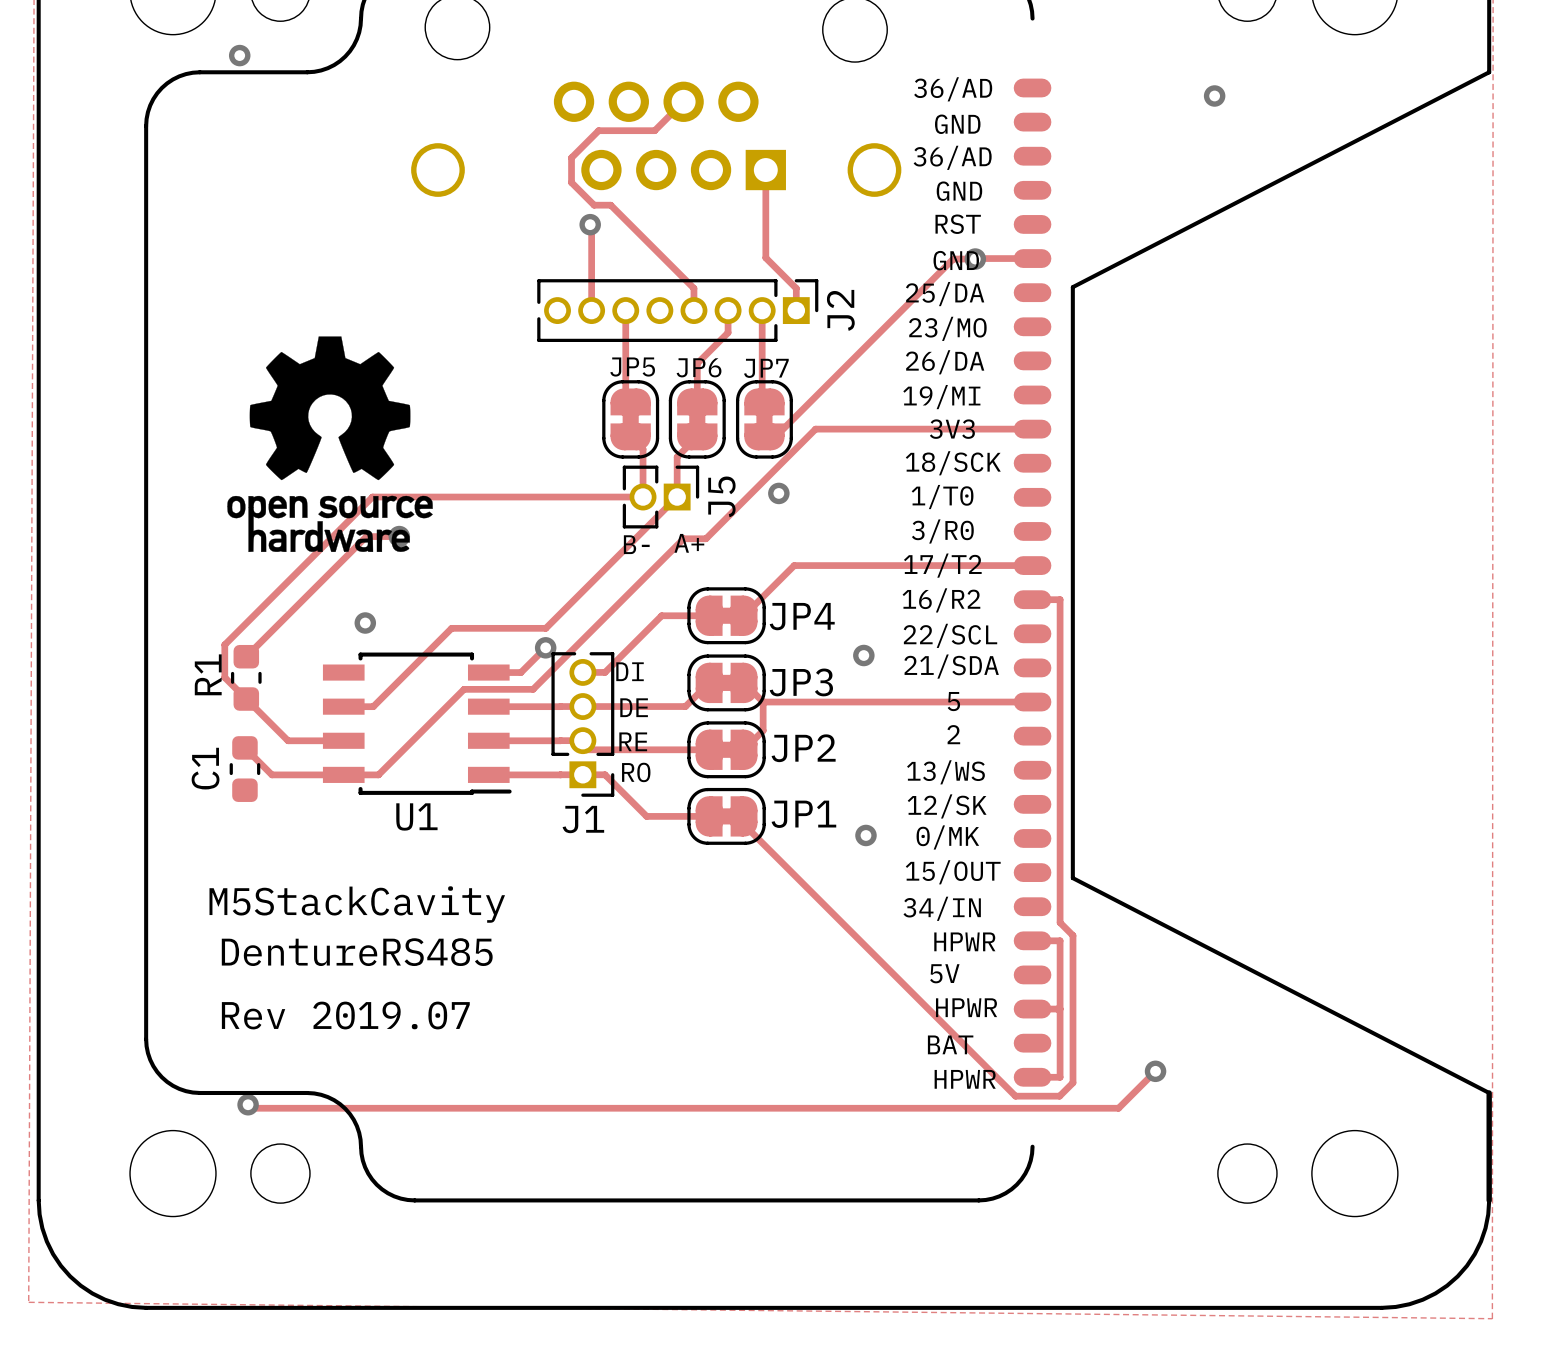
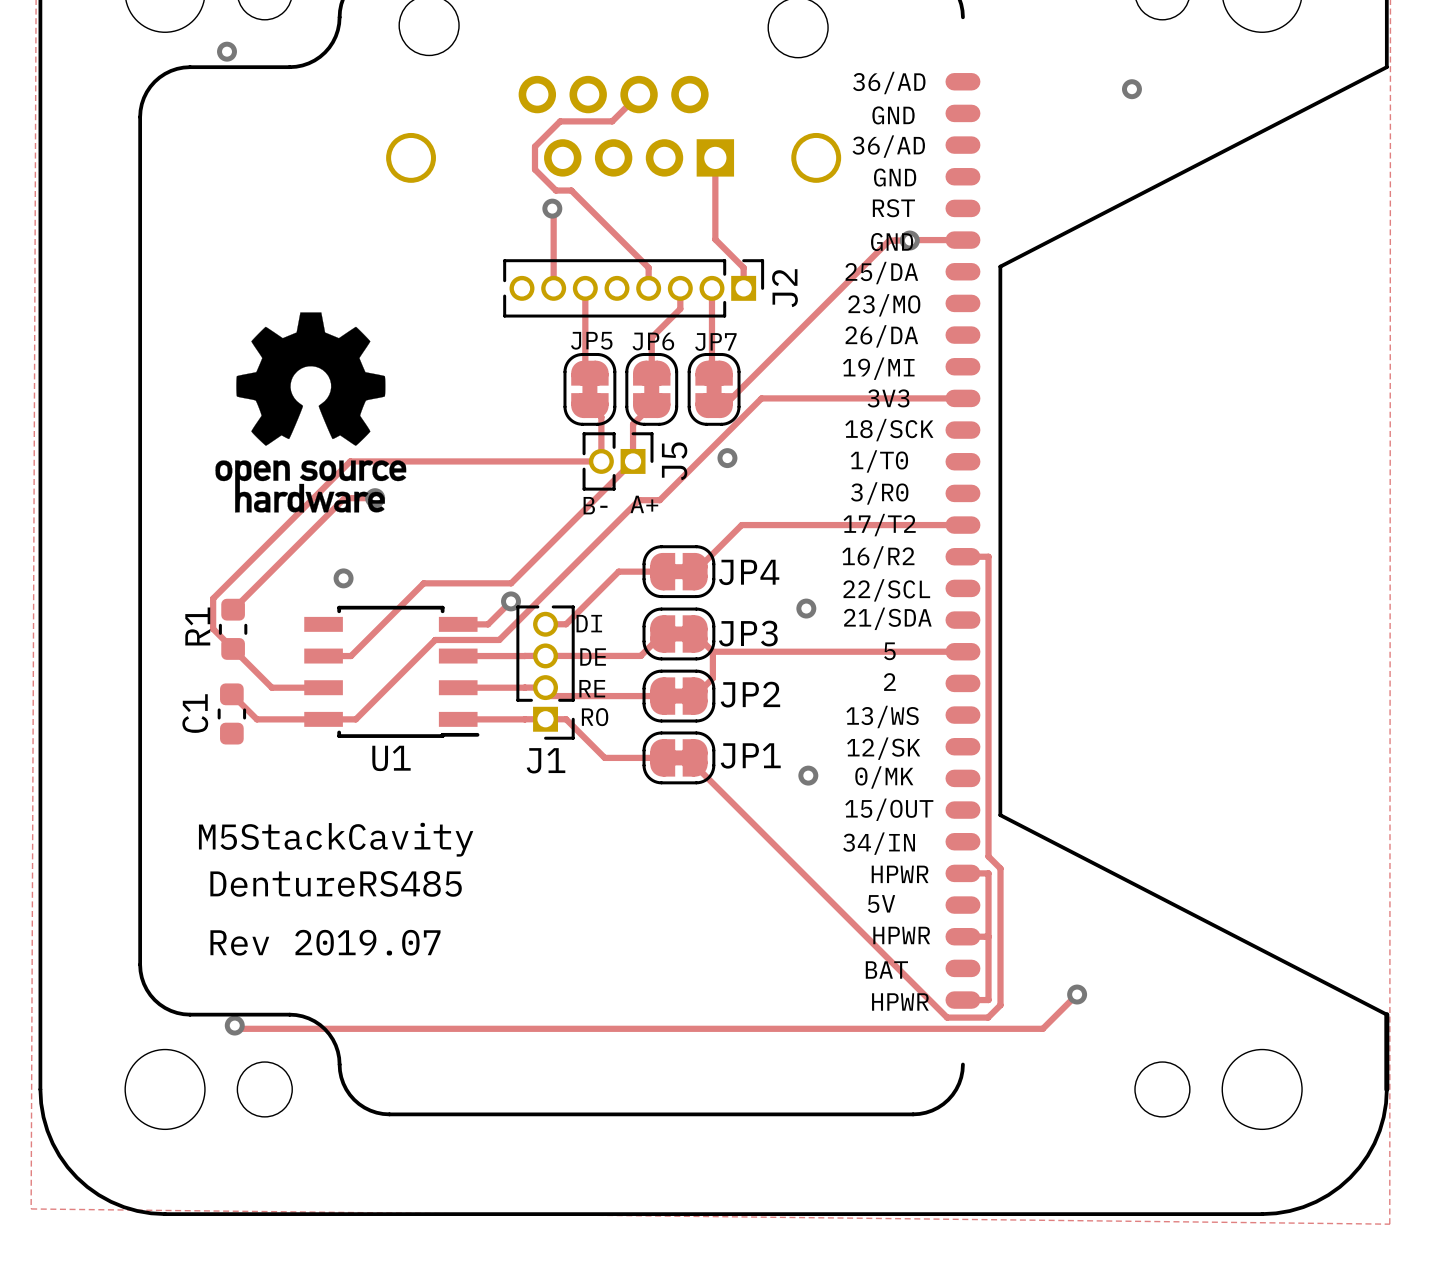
board edge: (38, 1173) (38, 1200) -> none
board edge: (1489, 1173) (1489, 1200) -> none
drawing shape: [36, 1198, 149, 1310] -> [38, 1087, 167, 1216]
drawing shape: [1379, 1198, 1492, 1310] -> [1260, 1087, 1389, 1216]
board edge: (146, 1307) (173, 1307) -> none
board edge: (1354, 1307) (1381, 1307) -> none

